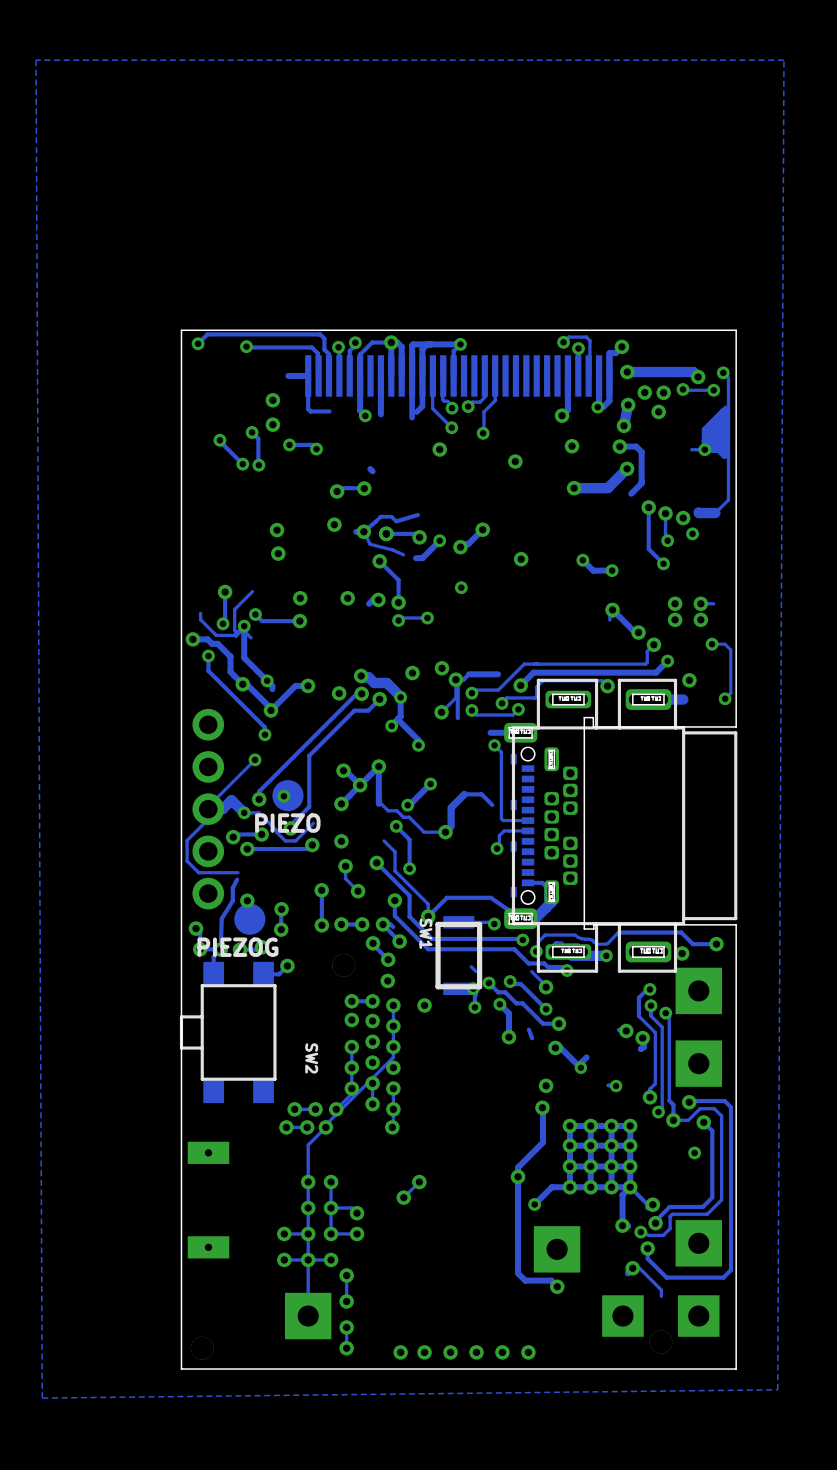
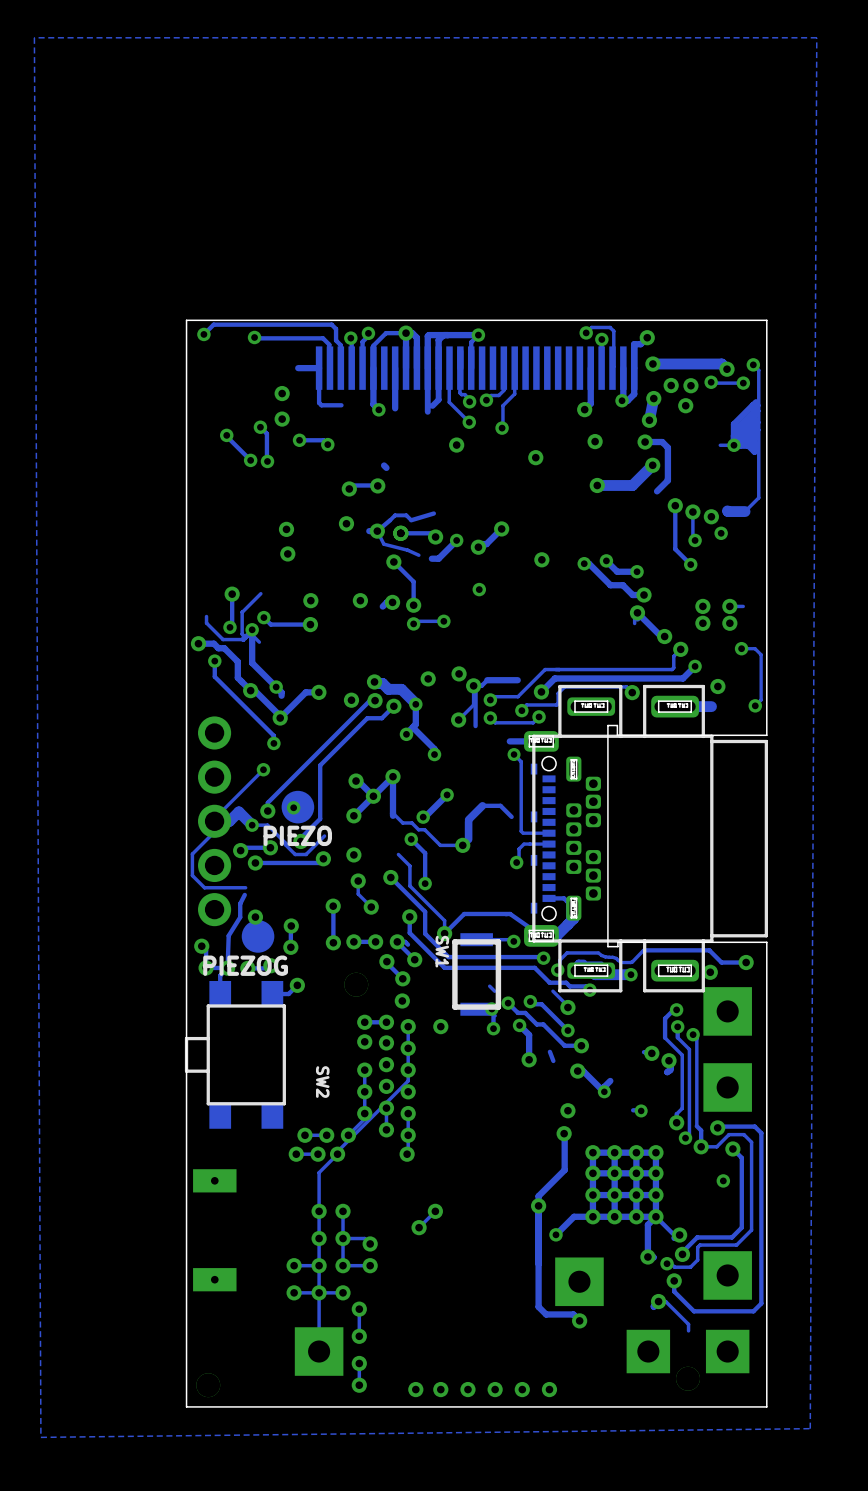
track: none -> (584, 563) (589, 563) (610, 585) (622, 585) (632, 595) (644, 595)
via: none -> (584, 563)
via: none -> (644, 595)

